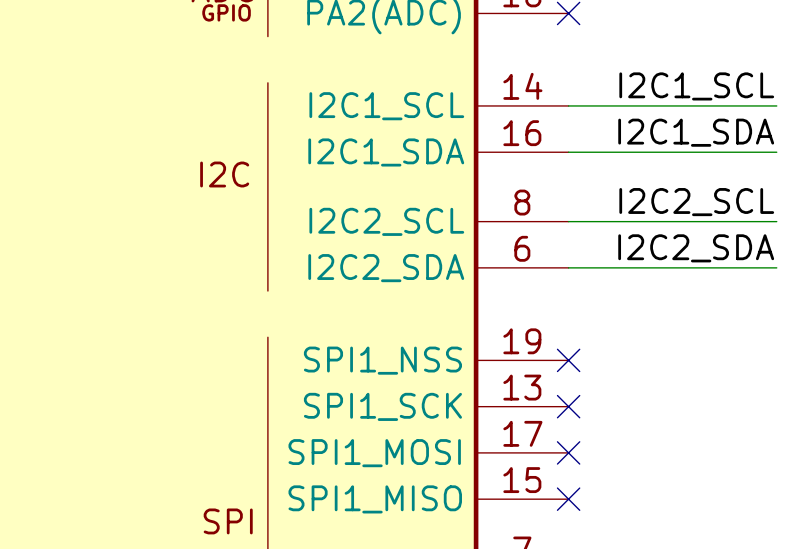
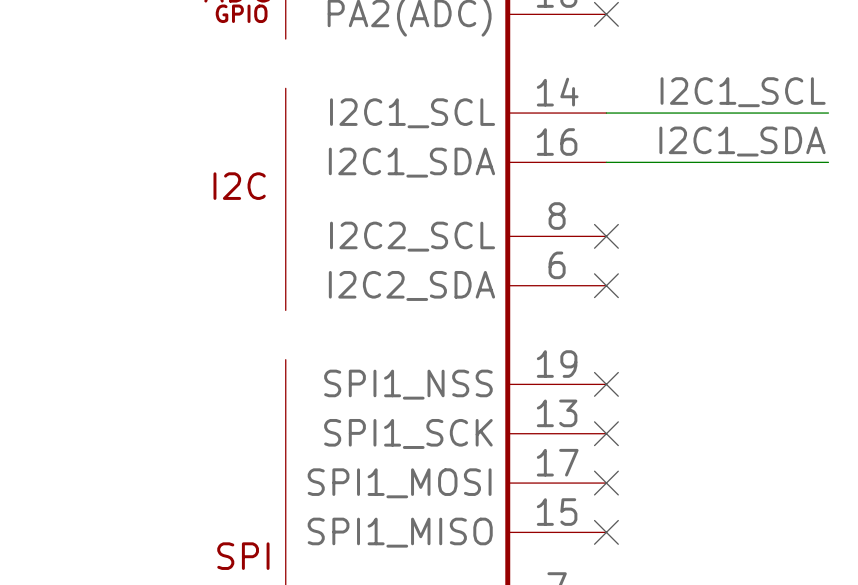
label: I2C2_SCL (696, 202) -> none
wire: (568, 221) (776, 221) -> none
no-connect mark: none -> (606, 236)
label: I2C2_SDA (696, 248) -> none
wire: (568, 267) (776, 267) -> none
no-connect mark: none -> (606, 285)

